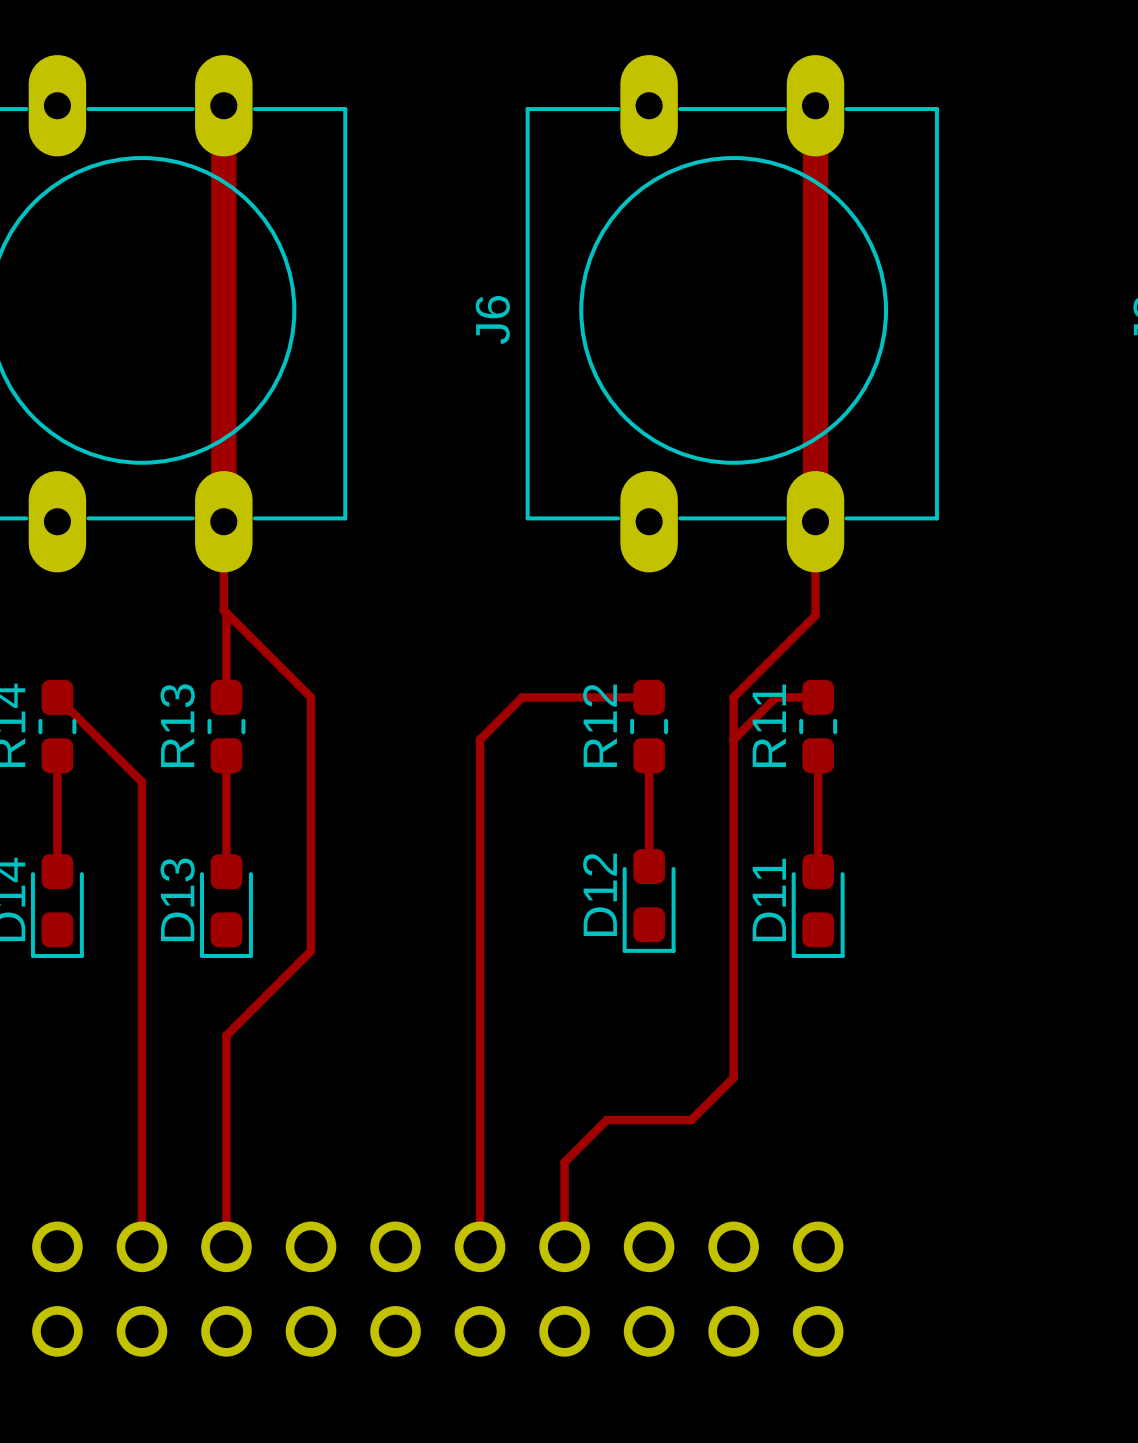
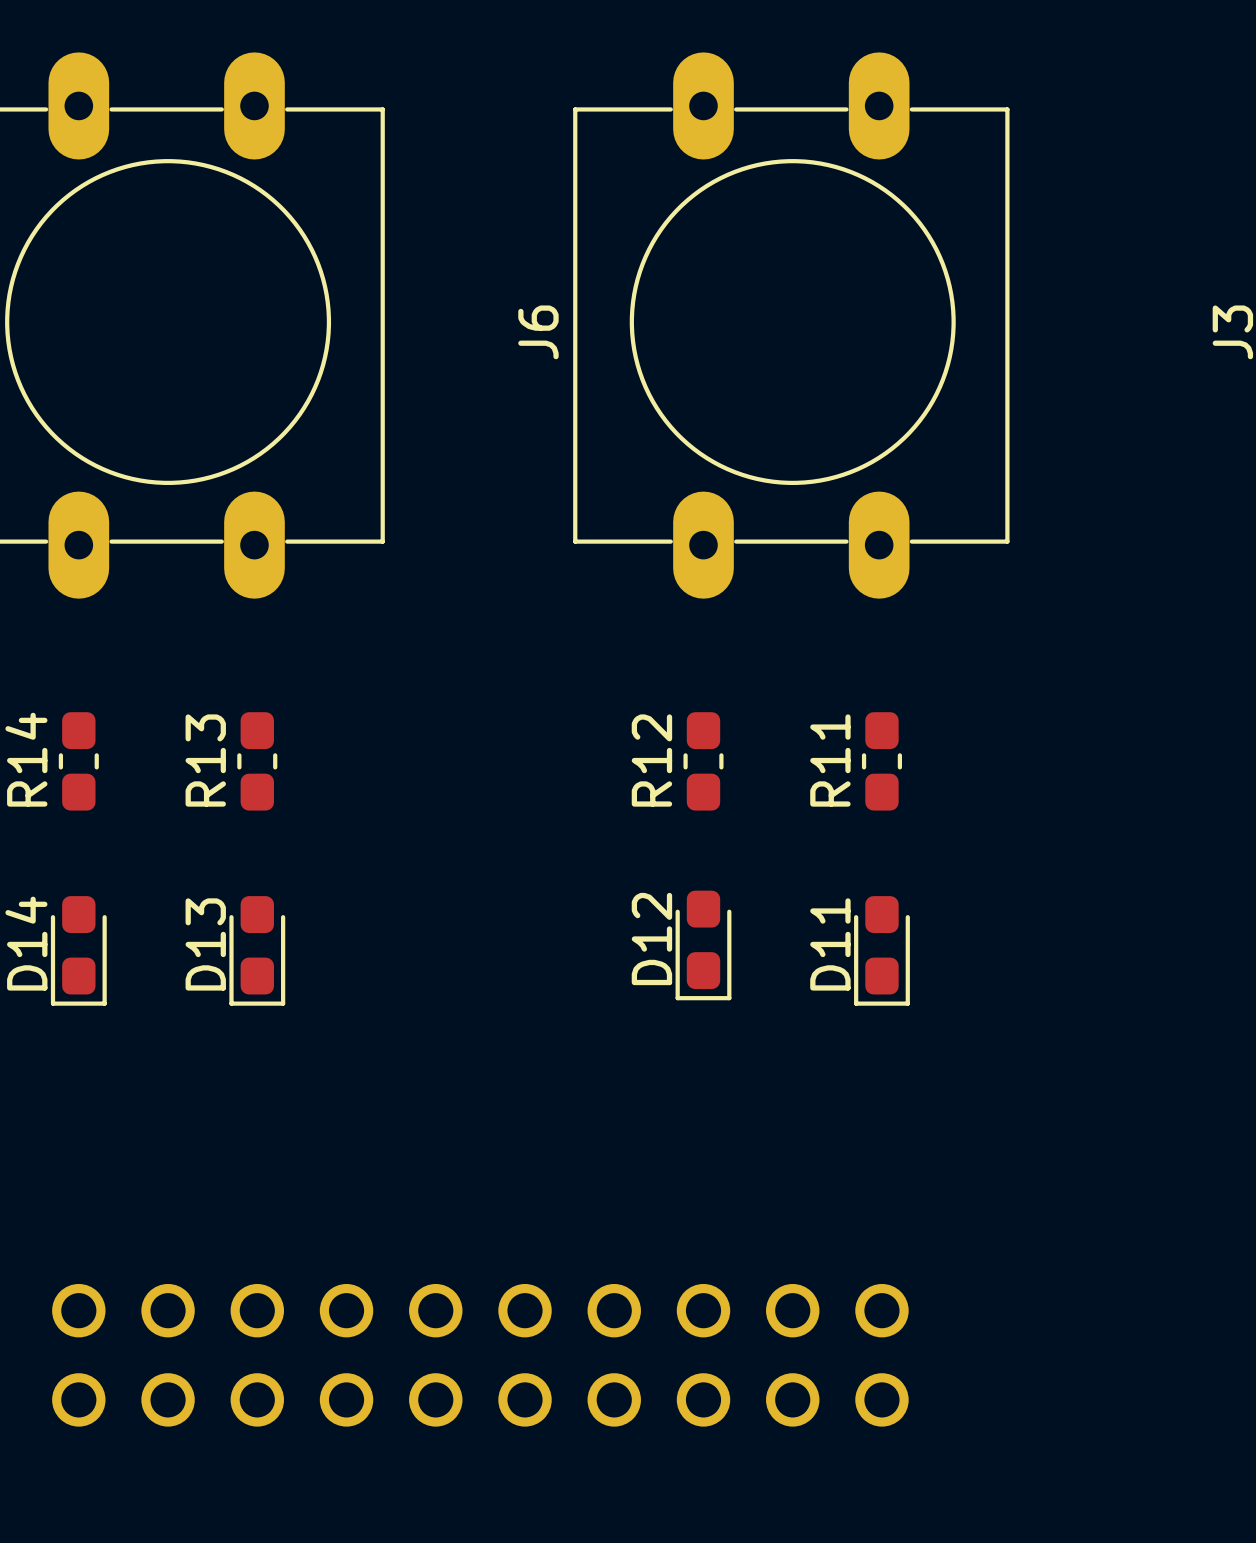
top track: (223, 105) (223, 610) (311, 697) (311, 951) (226, 1035) (226, 1246) -> none
top track: (815, 105) (815, 615) (733, 697) (733, 1077) (691, 1120) (606, 1120) (564, 1162) (564, 1246) -> none
top track: (226, 612) (226, 697) -> none
top track: (57, 697) (141, 781) (141, 1246) -> none
top track: (649, 697) (522, 697) (480, 739) (480, 1246) -> none
top track: (818, 697) (775, 697) (733, 739) -> none
top track: (57, 755) (57, 871) -> none
top track: (226, 755) (226, 871) -> none
top track: (649, 755) (649, 866) -> none
top track: (818, 755) (818, 871) -> none

